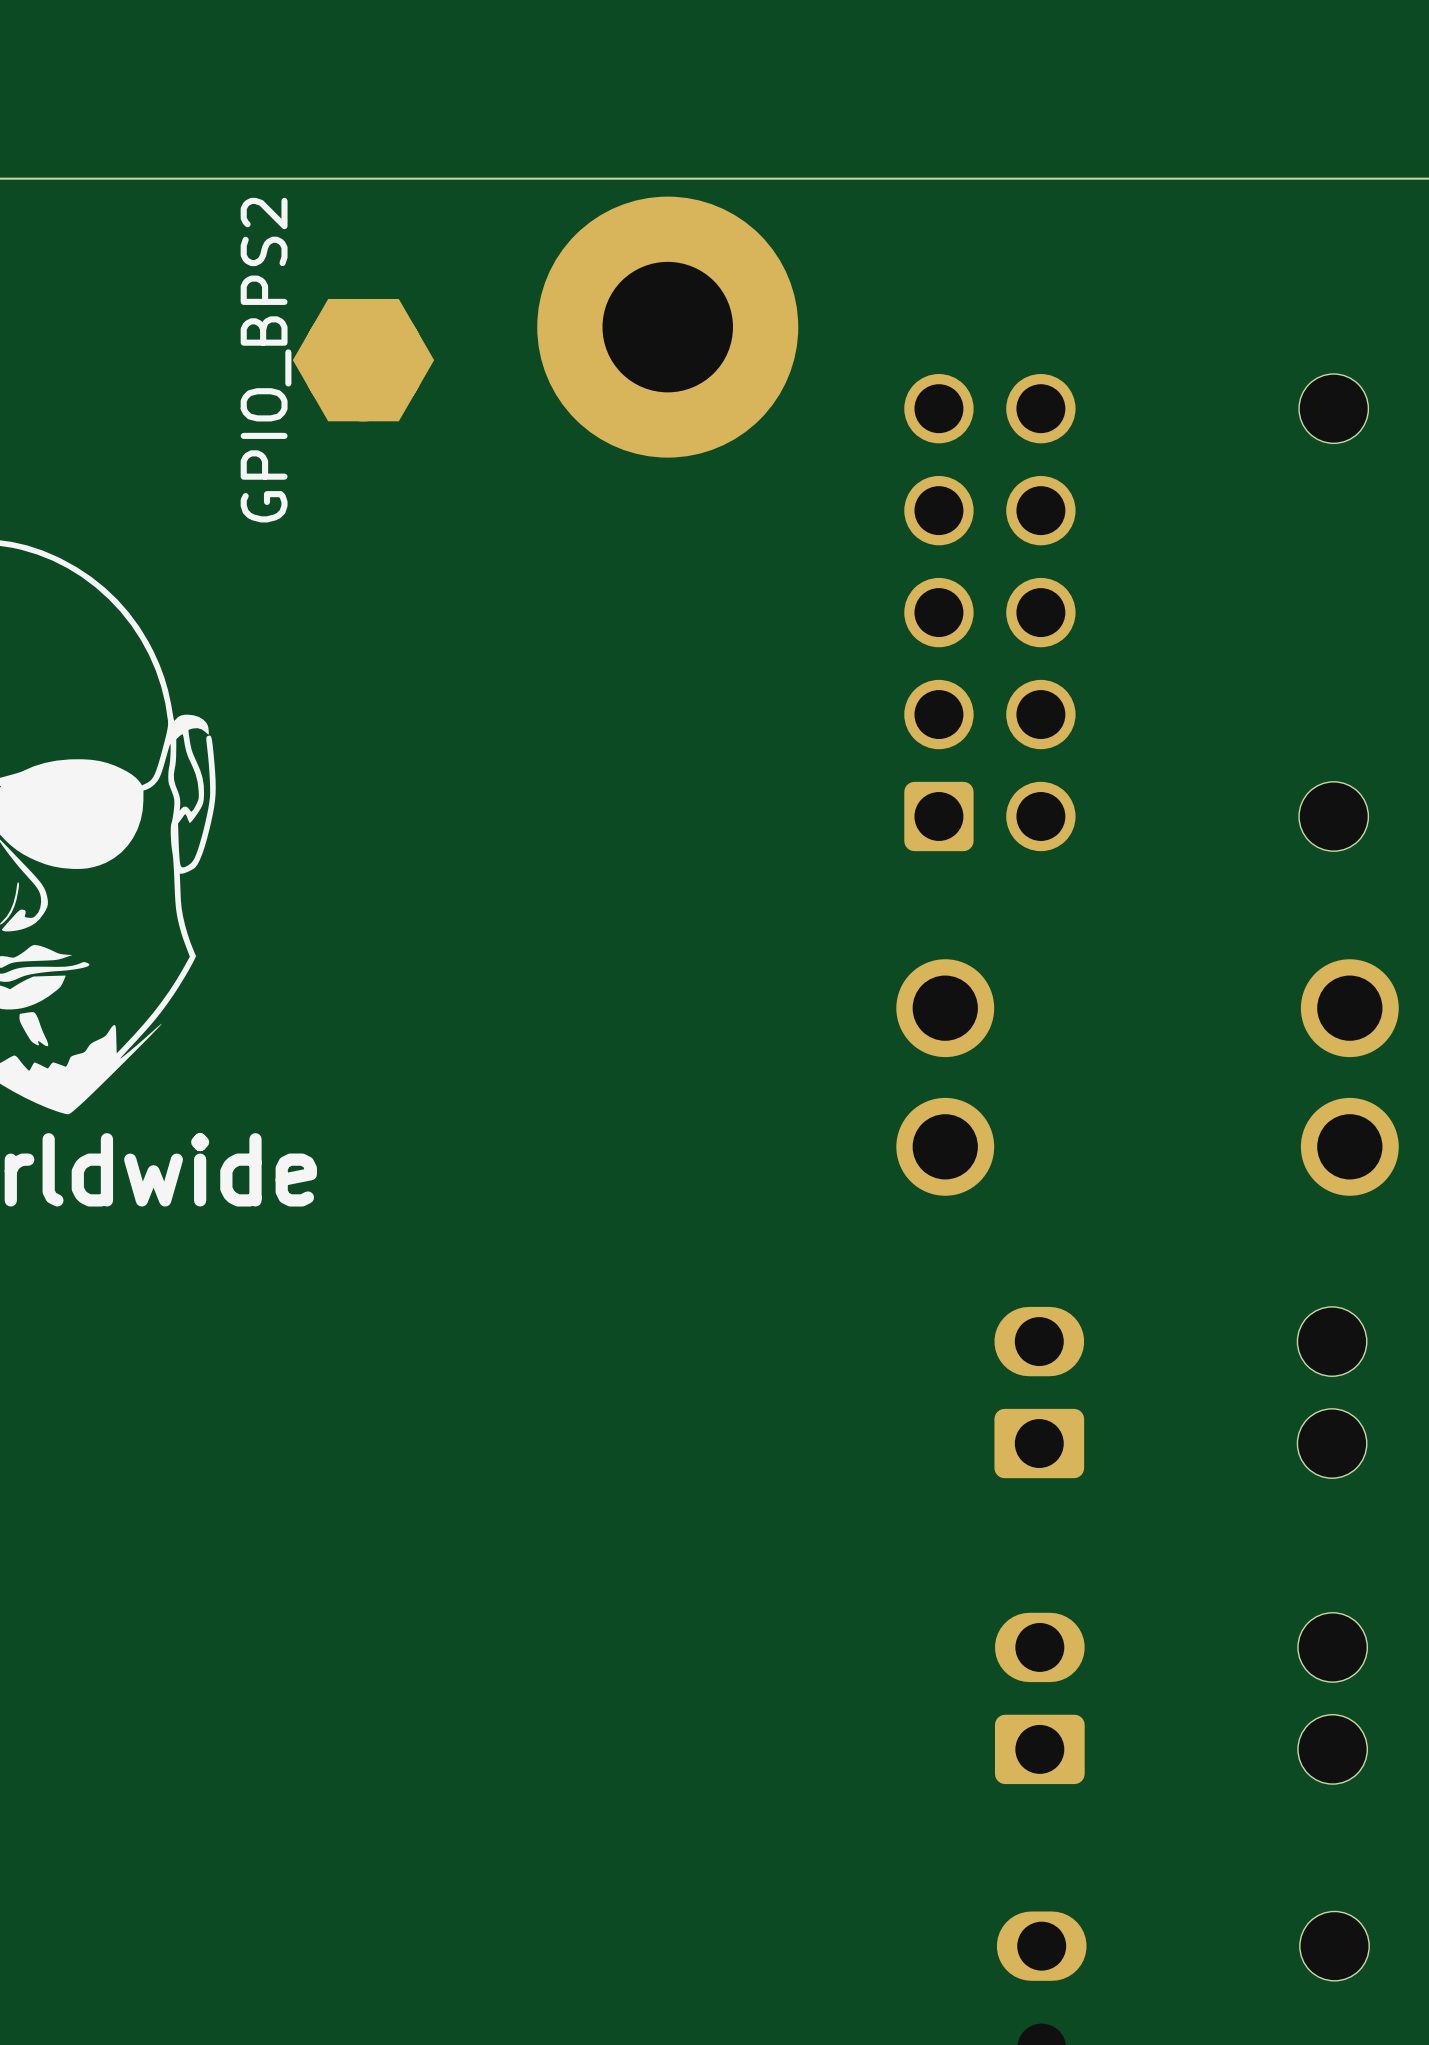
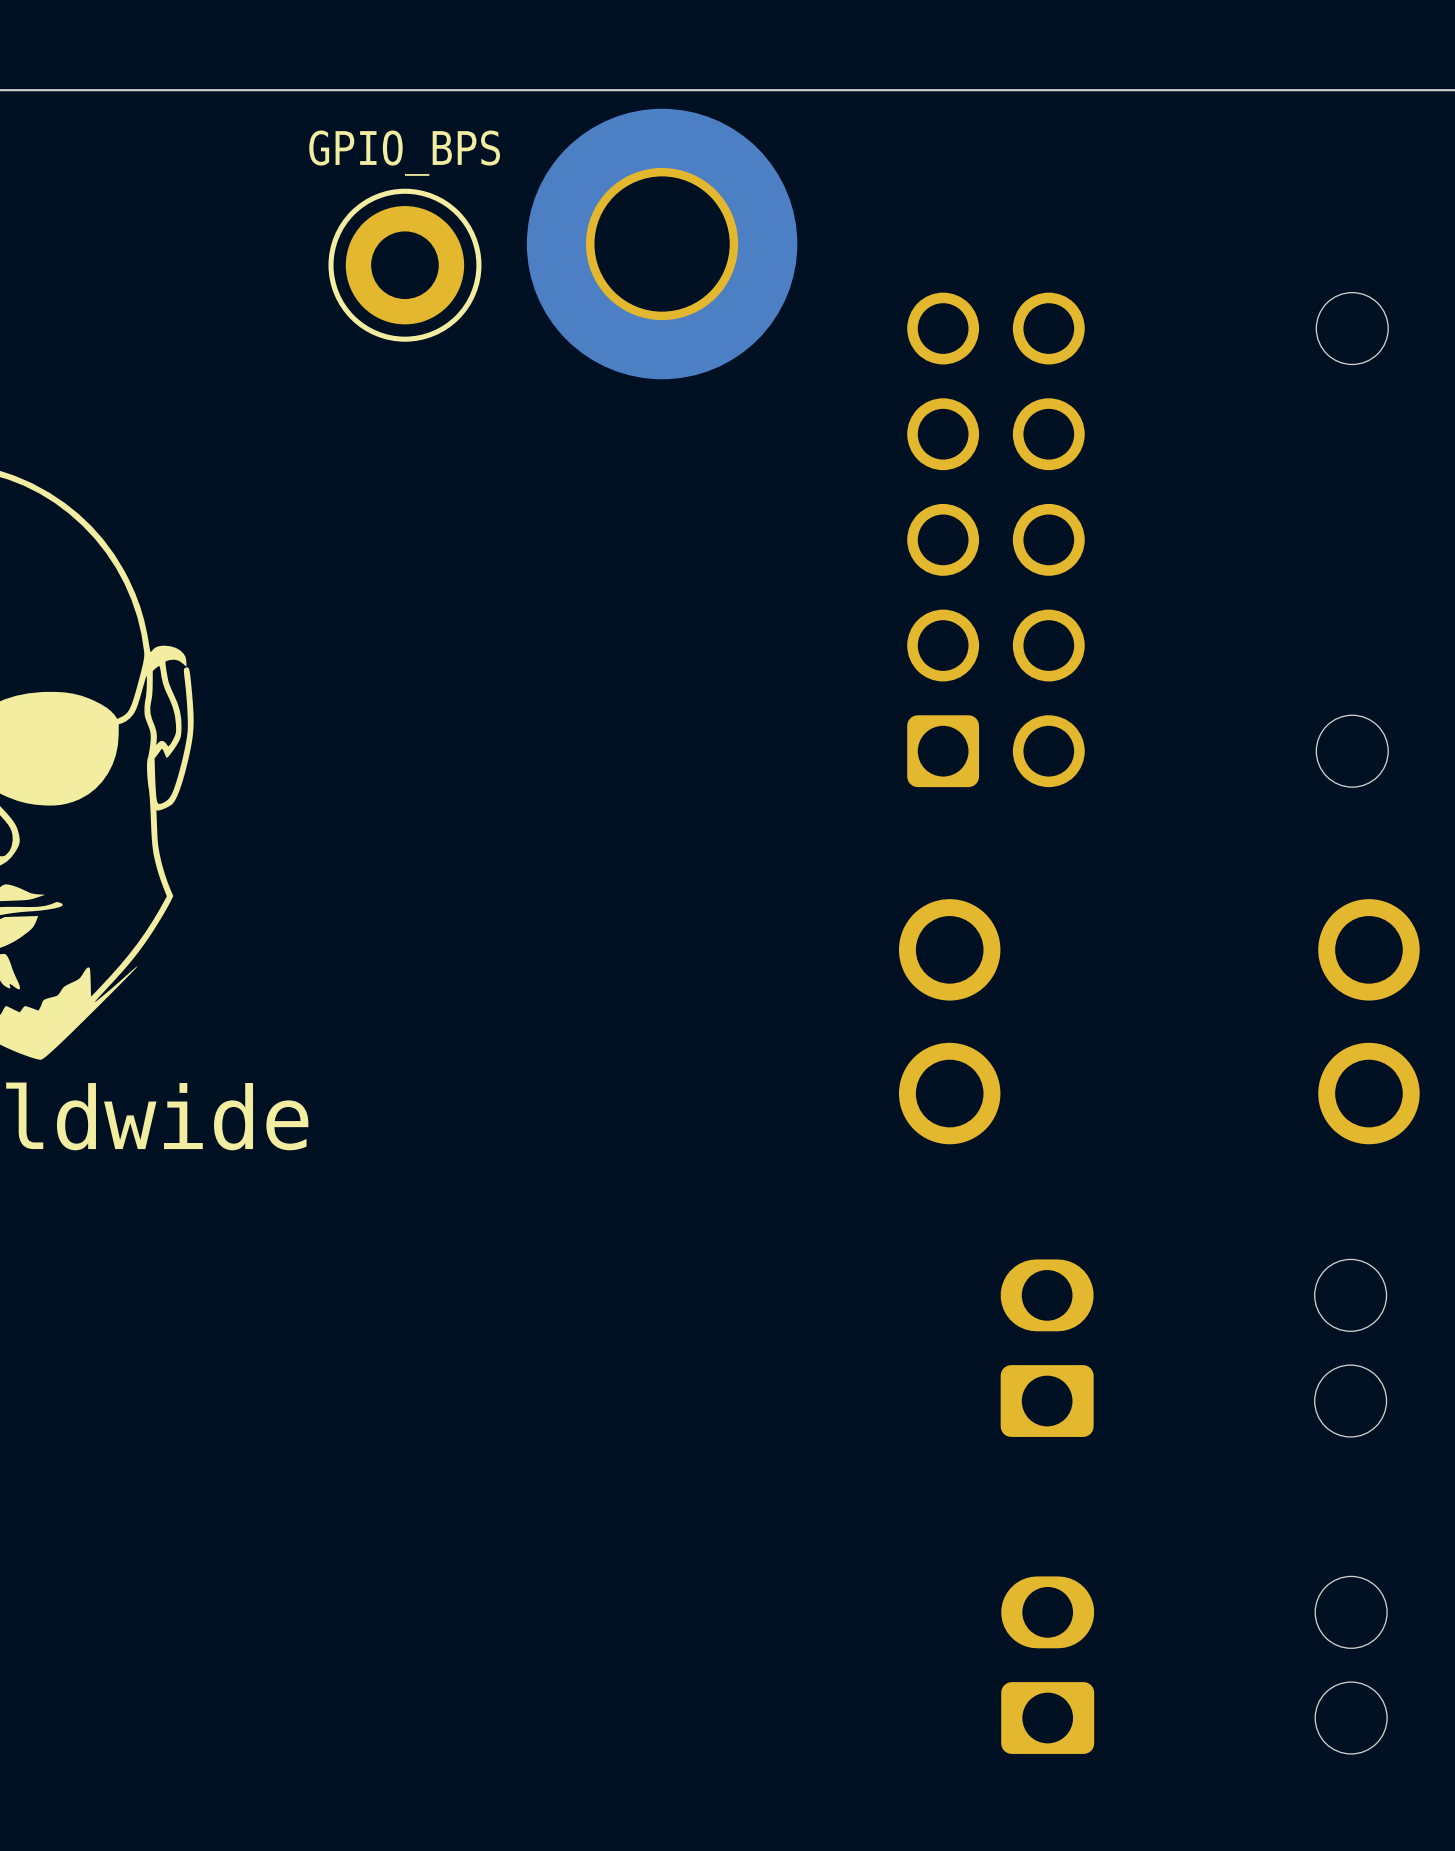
GPIO_BPS: none -> (404, 265)
GPIO_BPS2: (363, 360) -> none

